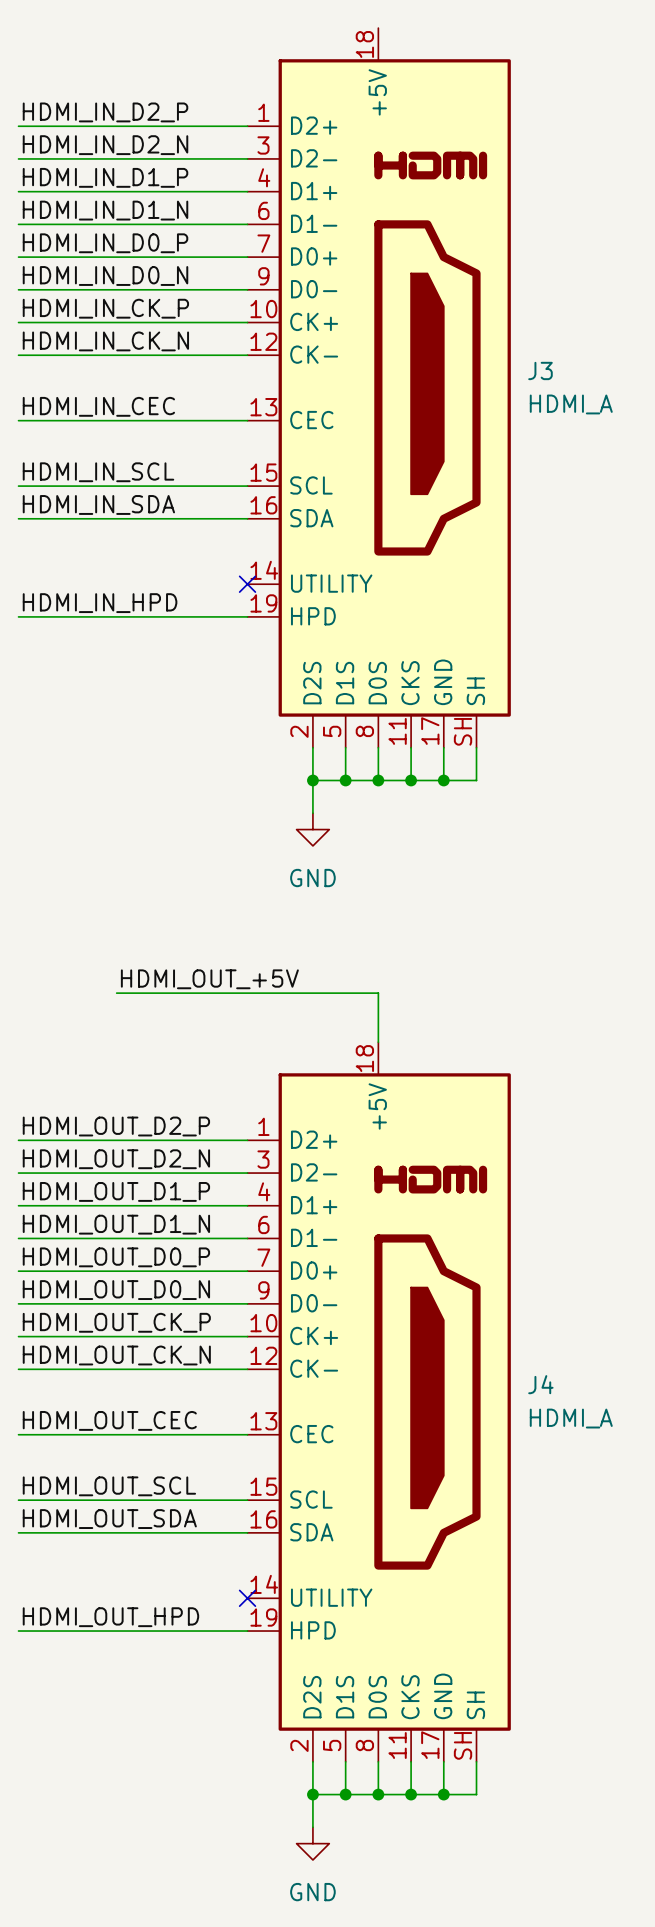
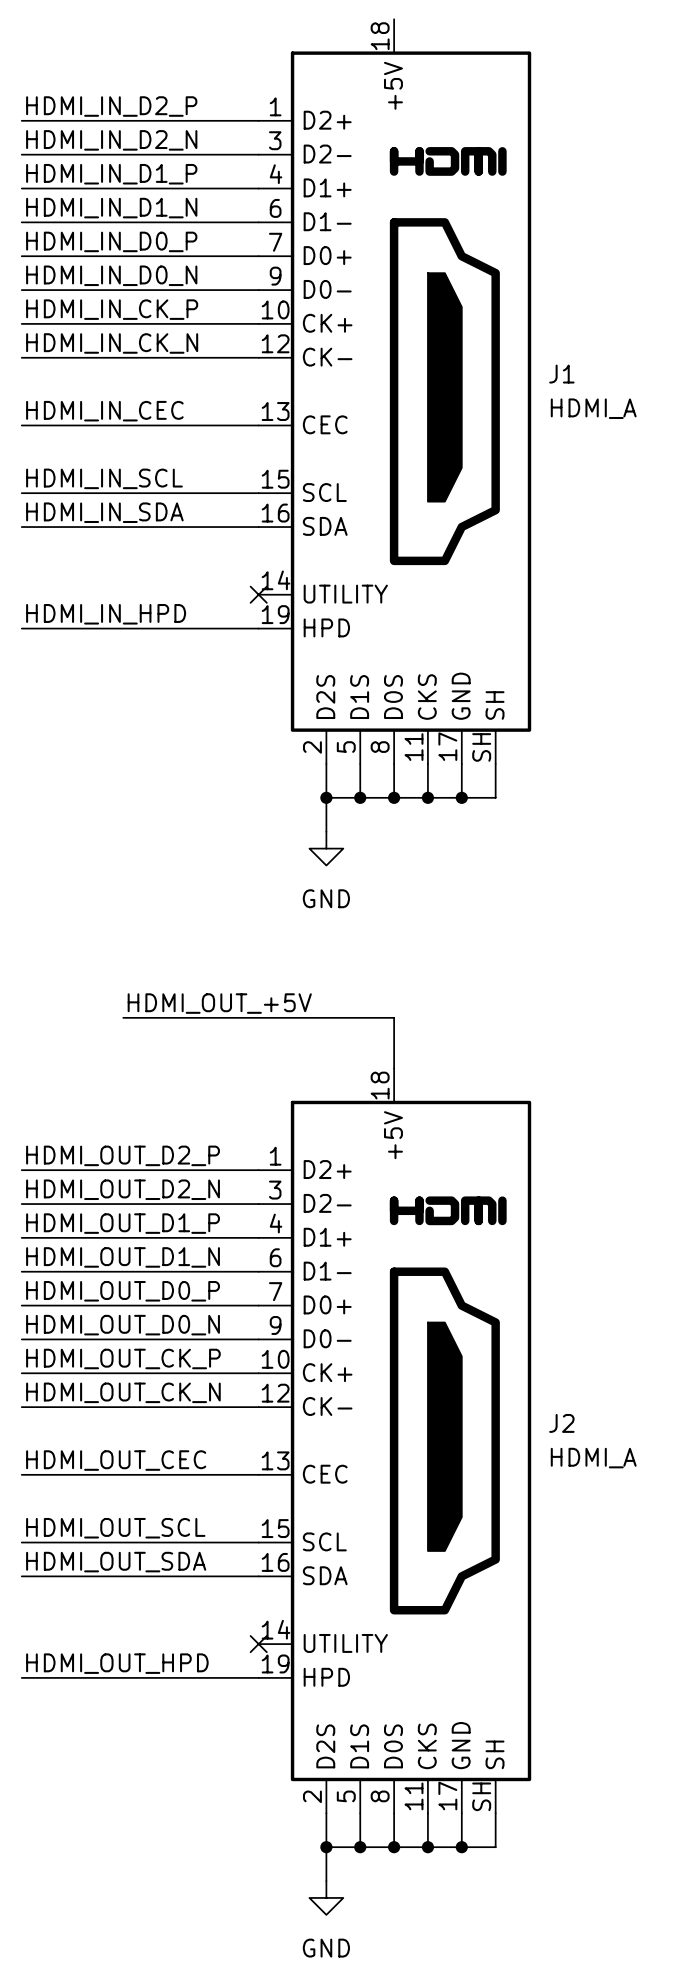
J3 name: J3 (540, 370) -> J1 (561, 374)
J4 name: J4 (540, 1384) -> J2 (561, 1423)

